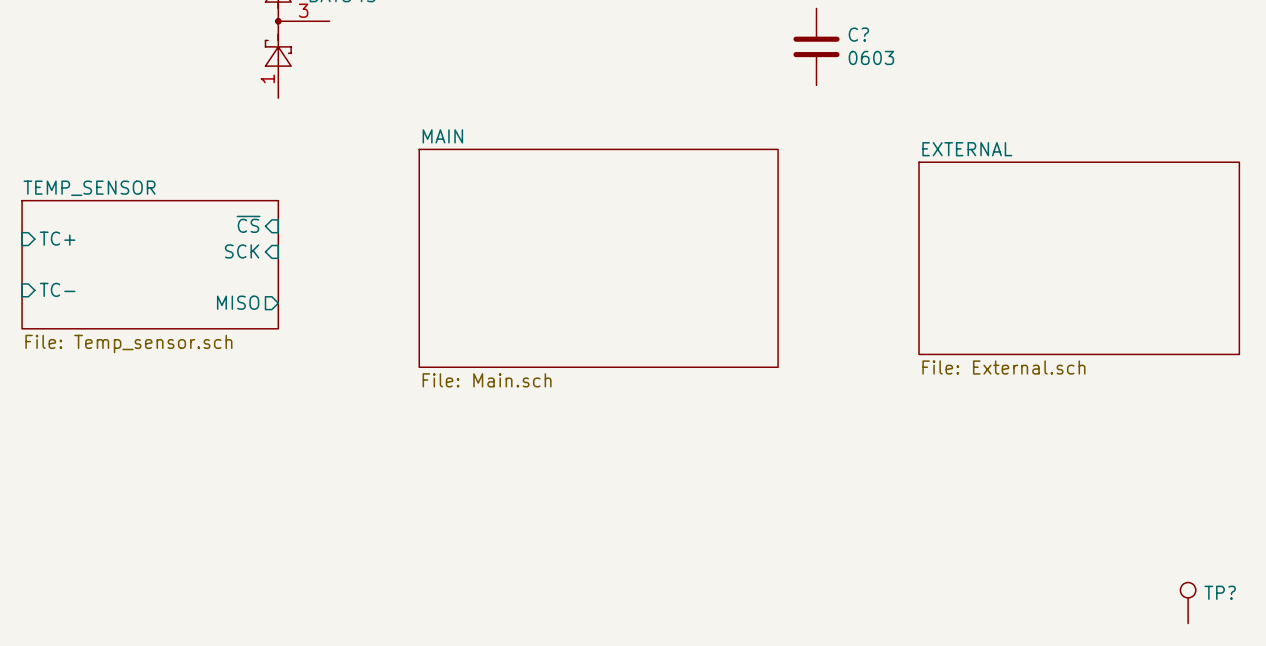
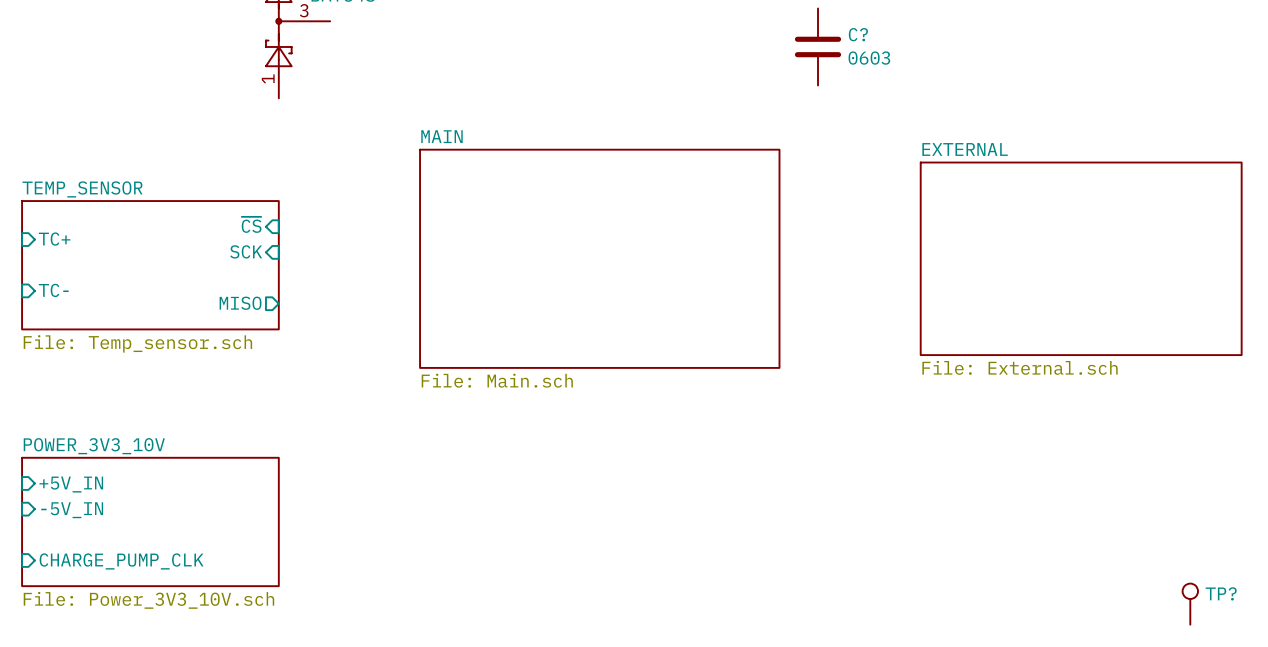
sheet pin: none -> +5V_IN (71, 484)
sheet pin: none -> -5V_IN (72, 510)
sheet POWER_3V3_10V: none -> File: Power_3V3_10V.sch (150, 521)
sheet pin: none -> CHARGE_PUMP_CLK (121, 561)

